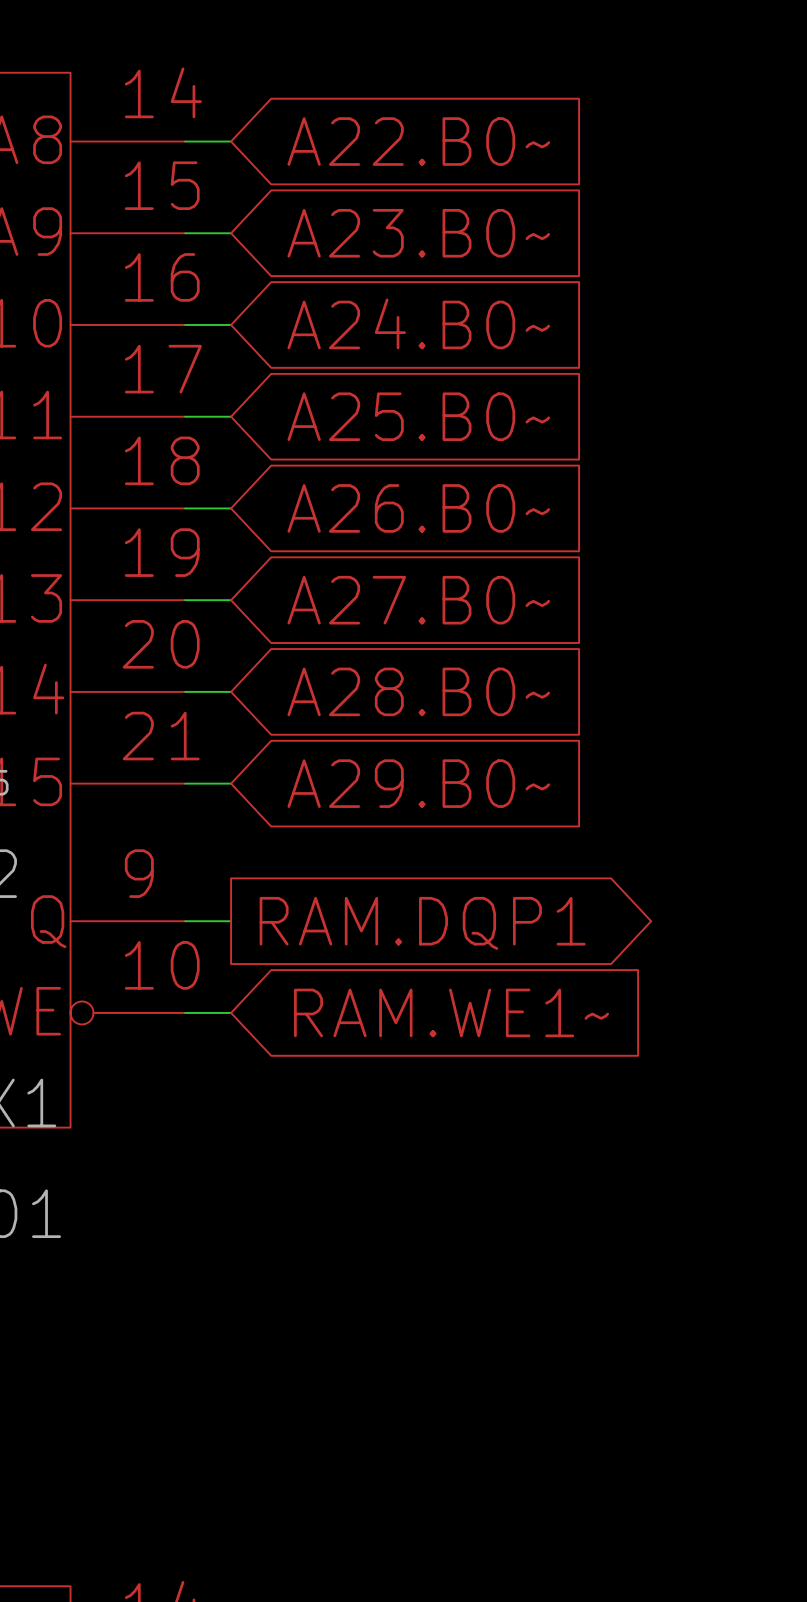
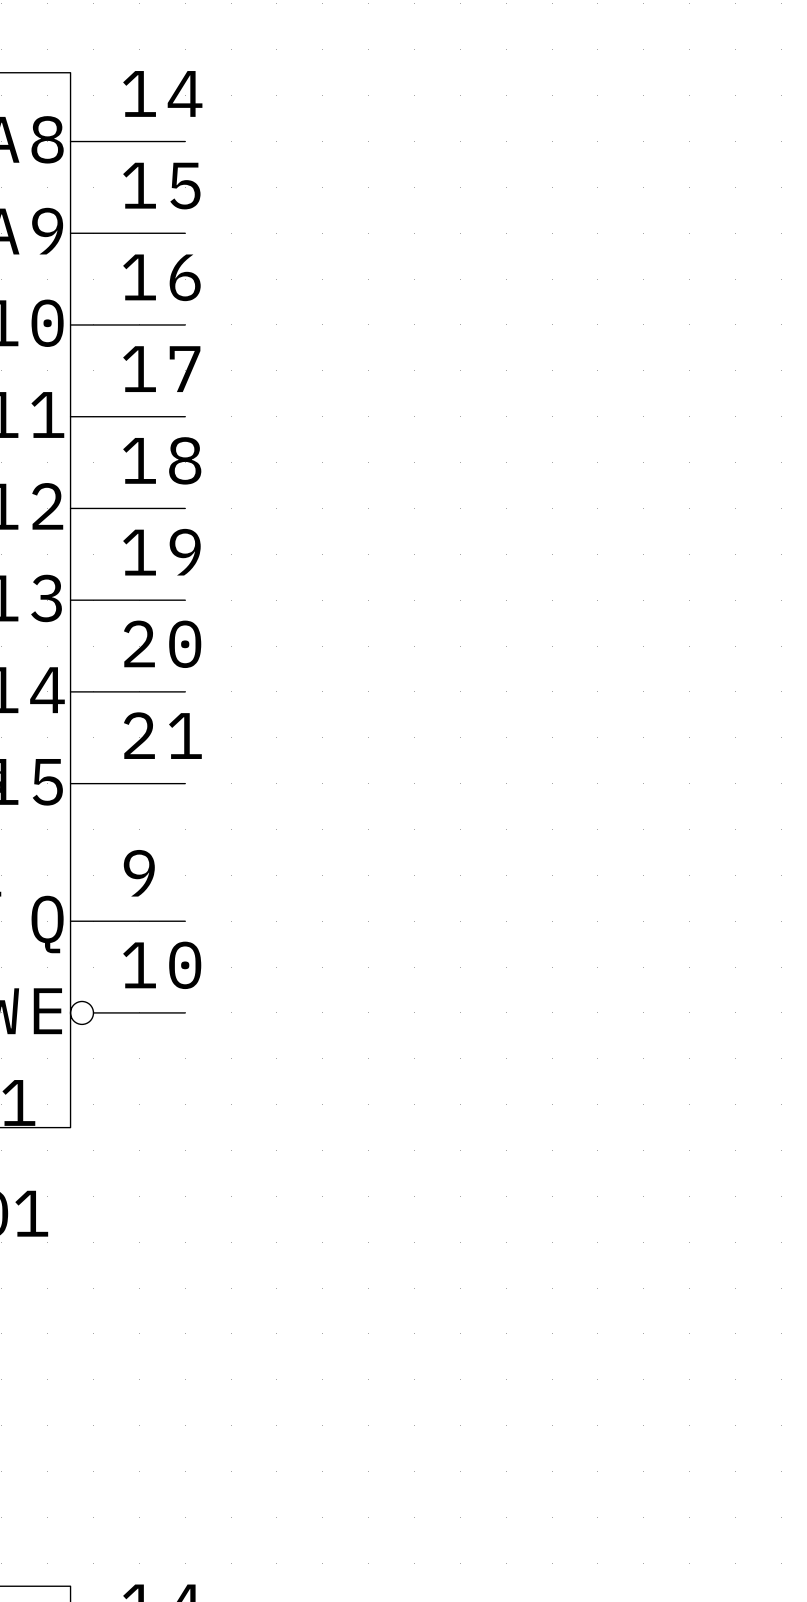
wire: (185, 141) (231, 141) -> none
global label: A22.B0~ (418, 141) -> none
wire: (185, 233) (231, 233) -> none
global label: A23.B0~ (418, 233) -> none
global label: A24.B0~ (418, 323) -> none
wire: (185, 324) (231, 324) -> none
wire: (185, 416) (231, 416) -> none
global label: A25.B0~ (418, 416) -> none
wire: (185, 508) (231, 508) -> none
global label: A26.B0~ (418, 508) -> none
wire: (185, 600) (231, 600) -> none
global label: A27.B0~ (418, 600) -> none
wire: (185, 691) (231, 691) -> none
global label: A28.B0~ (418, 691) -> none
wire: (185, 783) (231, 783) -> none
global label: A29.B0~ (418, 783) -> none
wire: (185, 921) (231, 921) -> none
global label: RAM.DQP1 (422, 923) -> none
wire: (185, 1012) (231, 1012) -> none
global label: RAM.WE1~ (451, 1012) -> none

